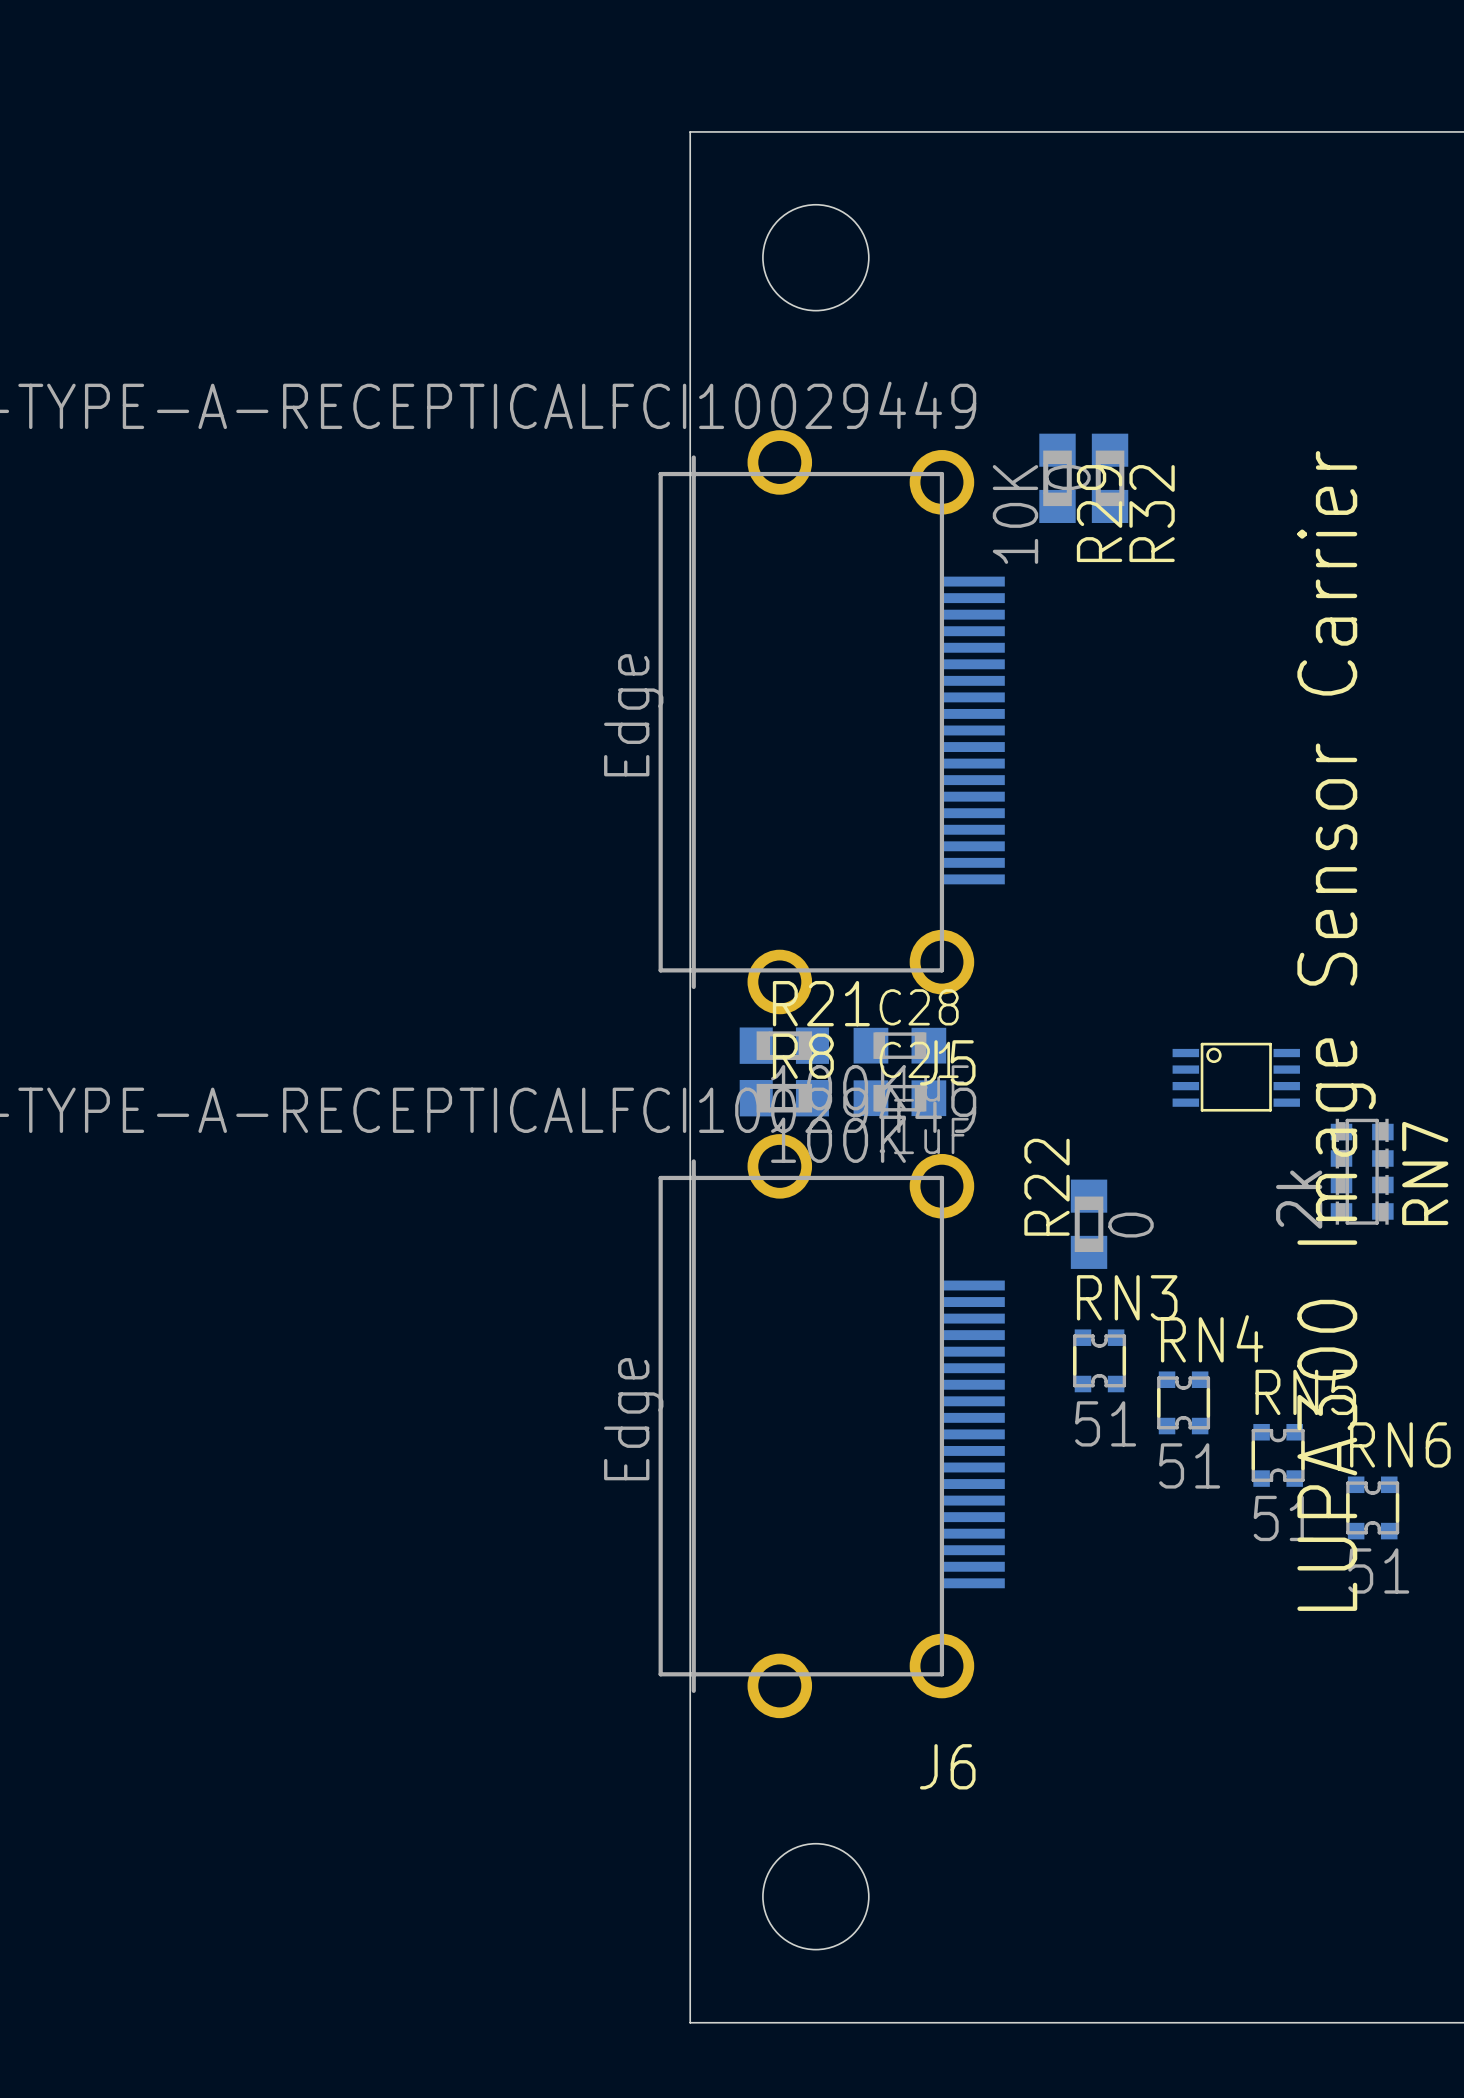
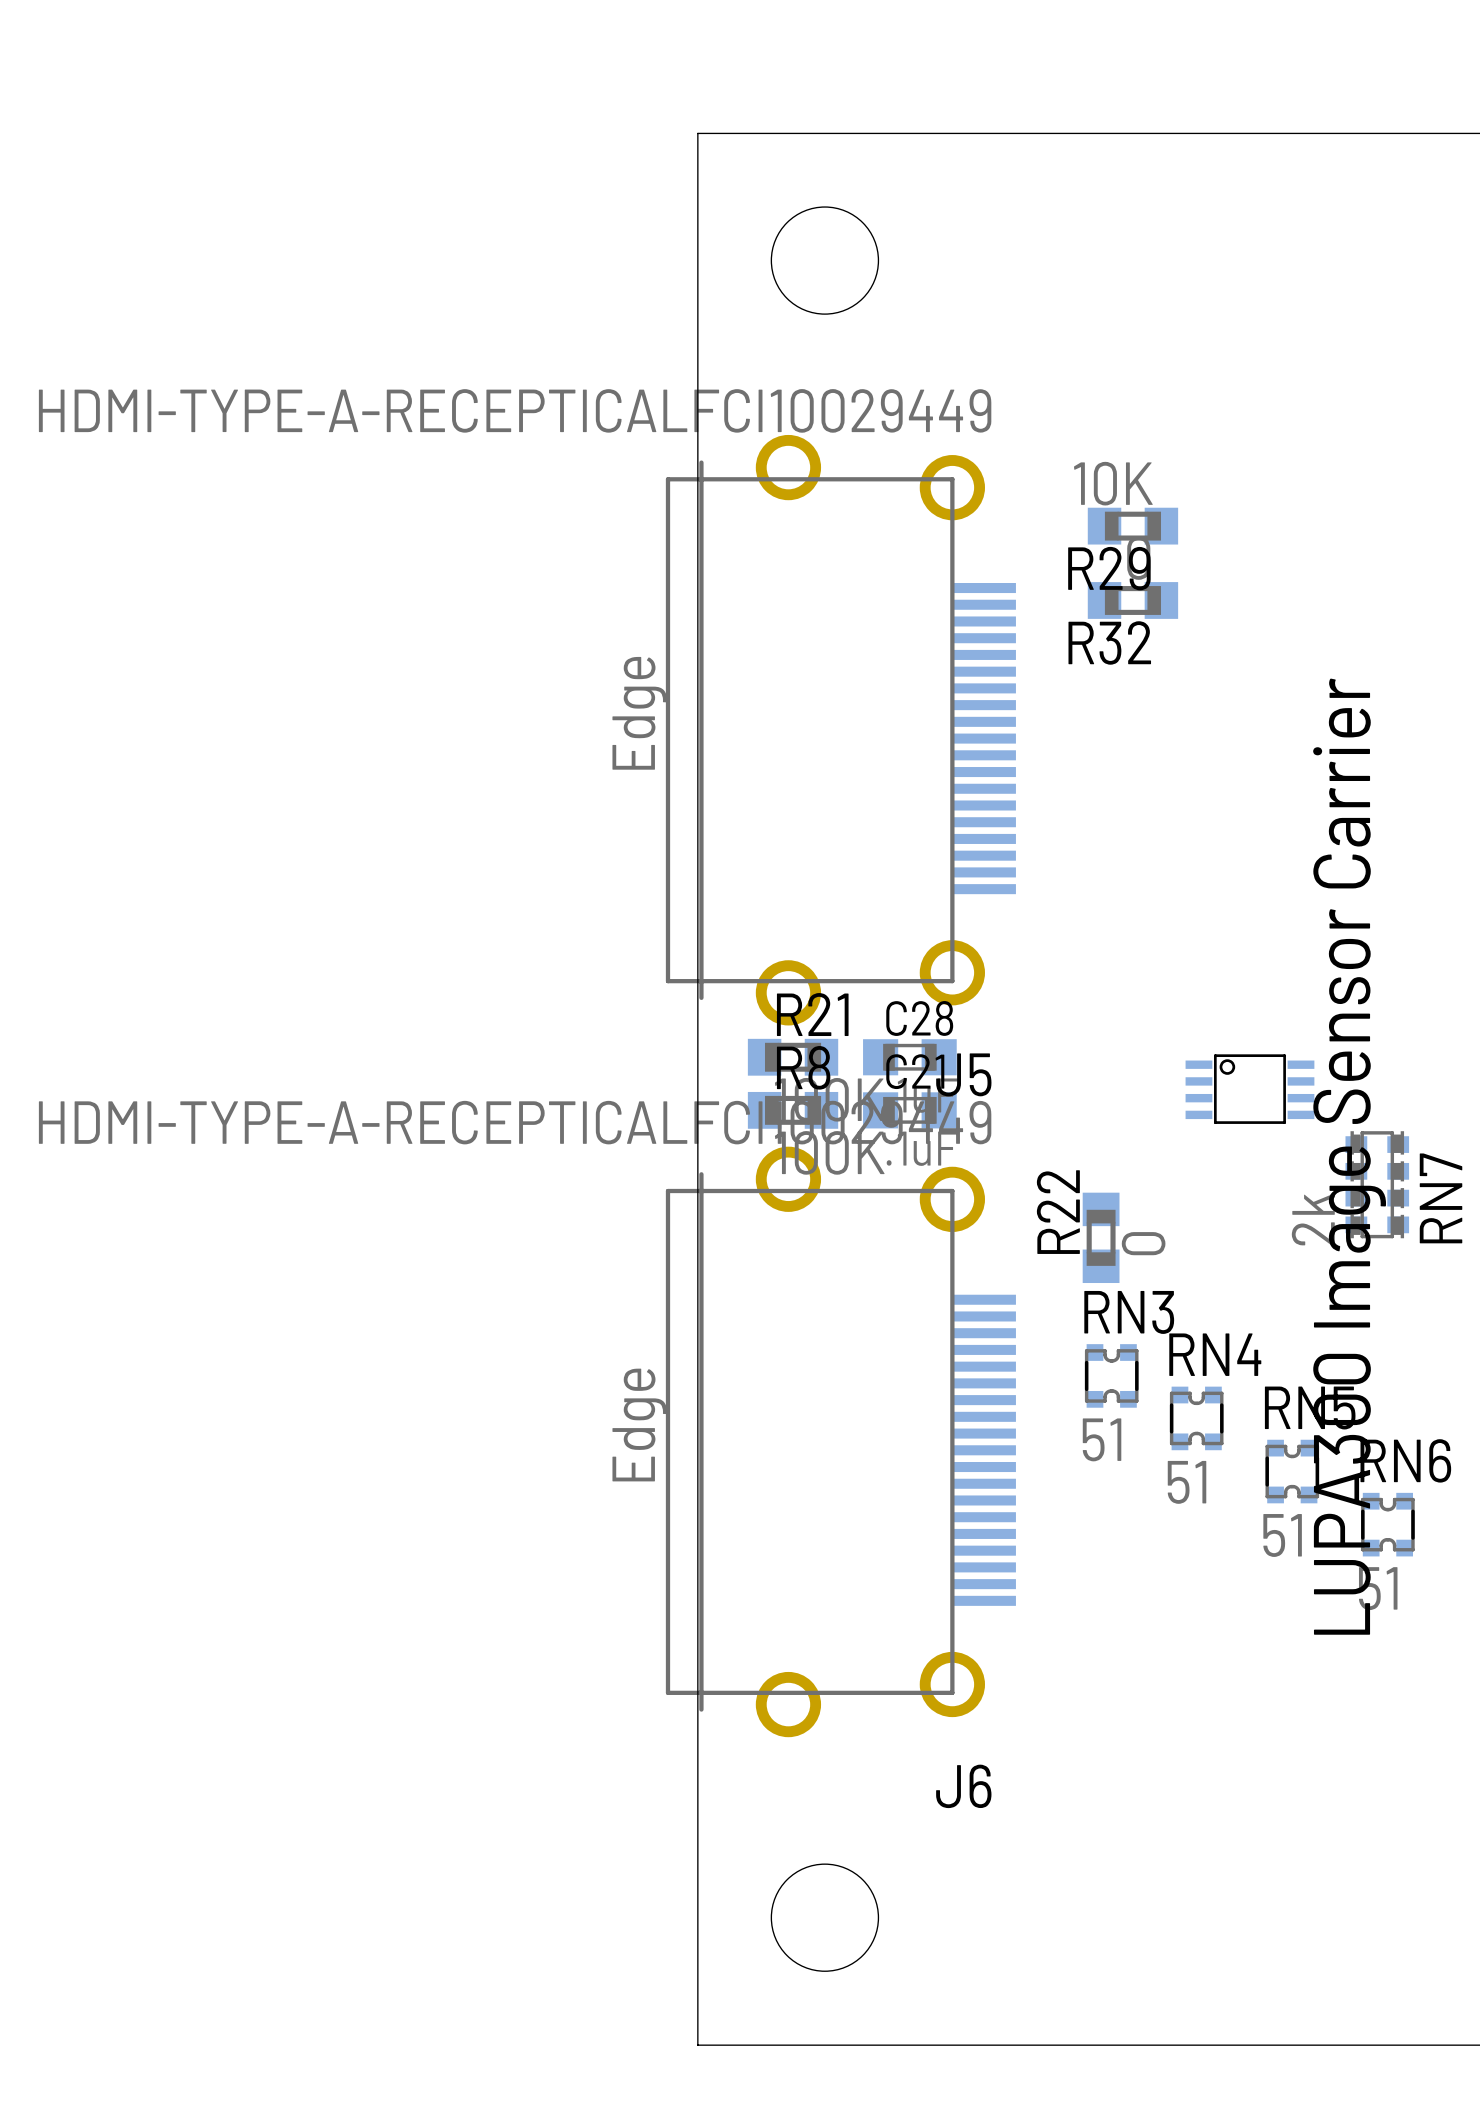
R29 rotation: 0° (1057, 478) -> 90° clockwise (1132, 526)
R29 position: (1057, 478) -> (1132, 526)
R32 rotation: 0° (1110, 478) -> 90° clockwise (1132, 600)
R32 position: (1110, 478) -> (1132, 600)

